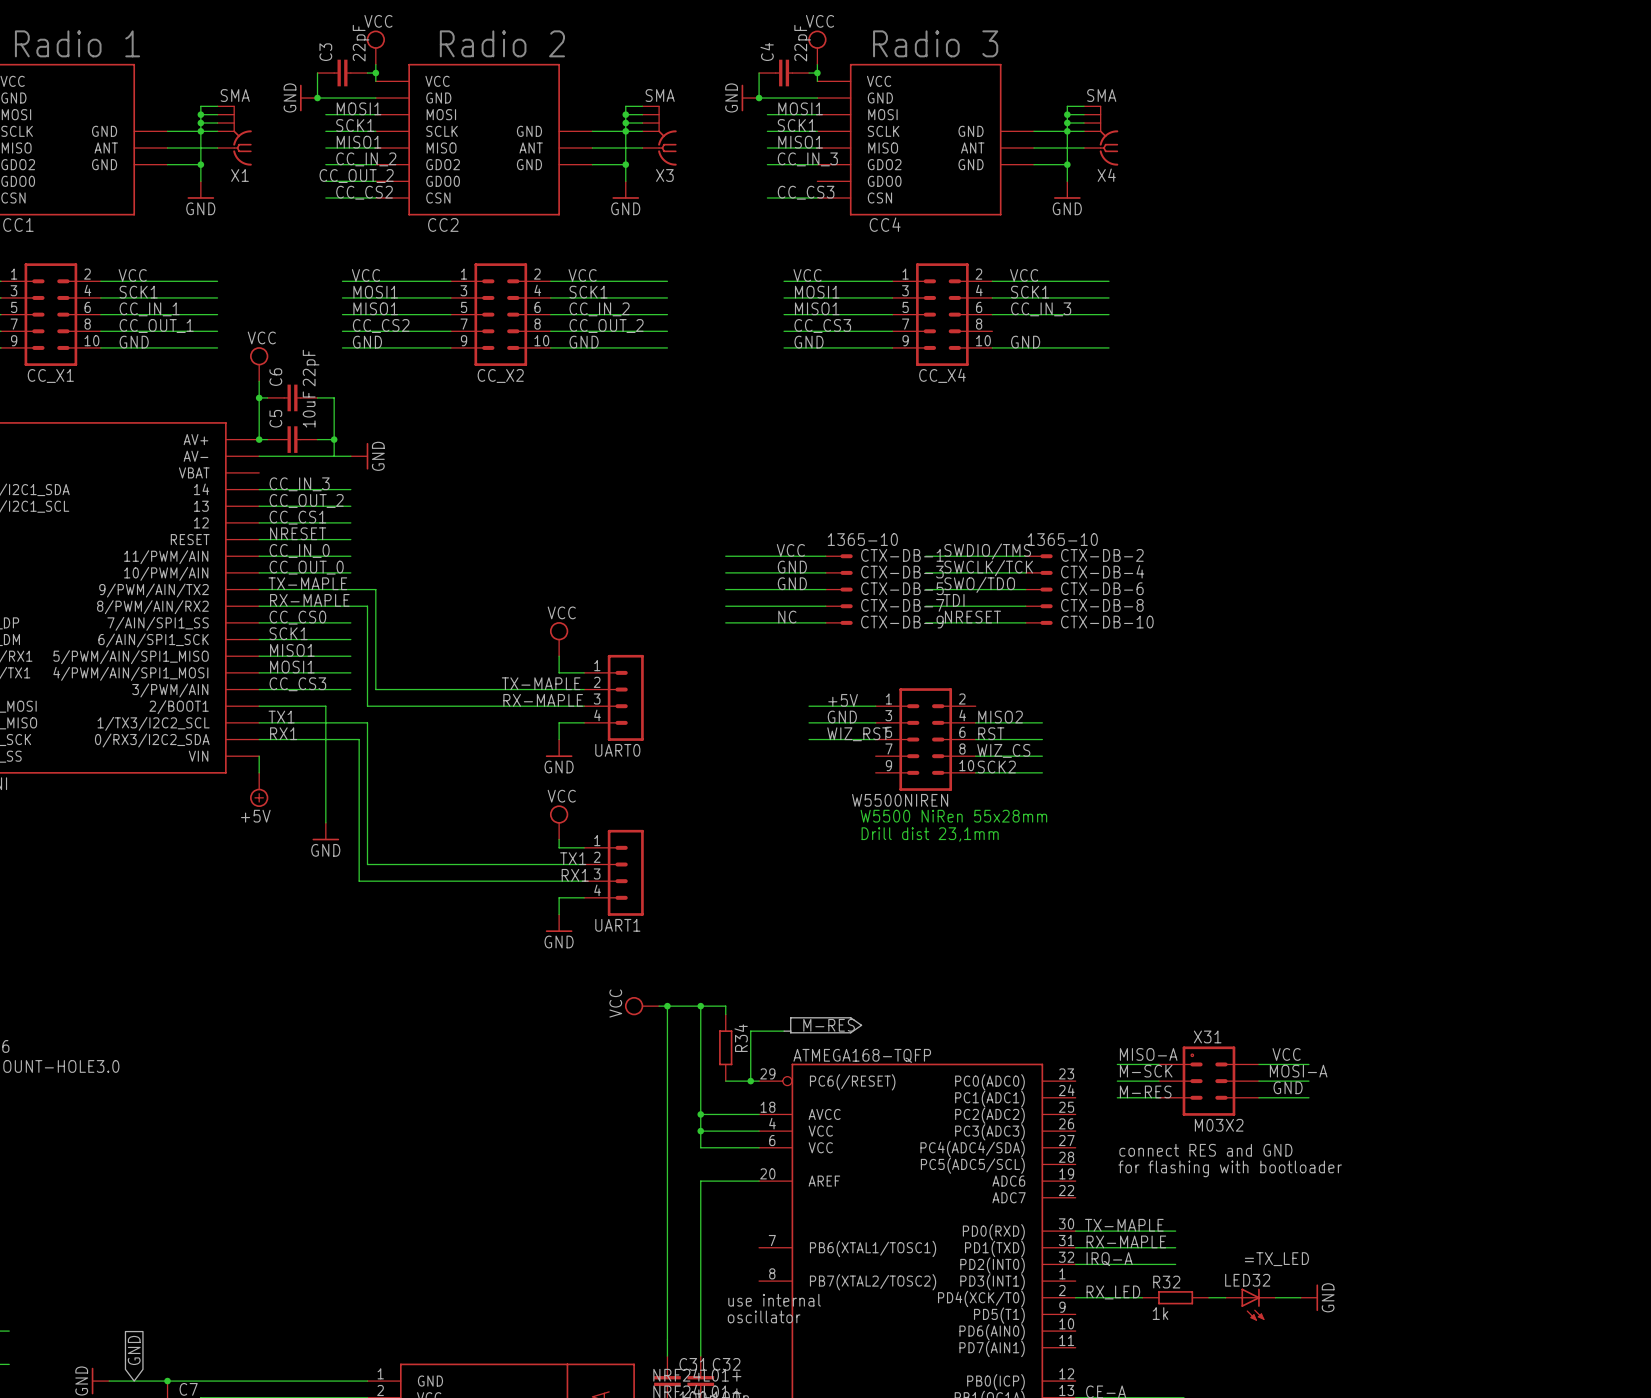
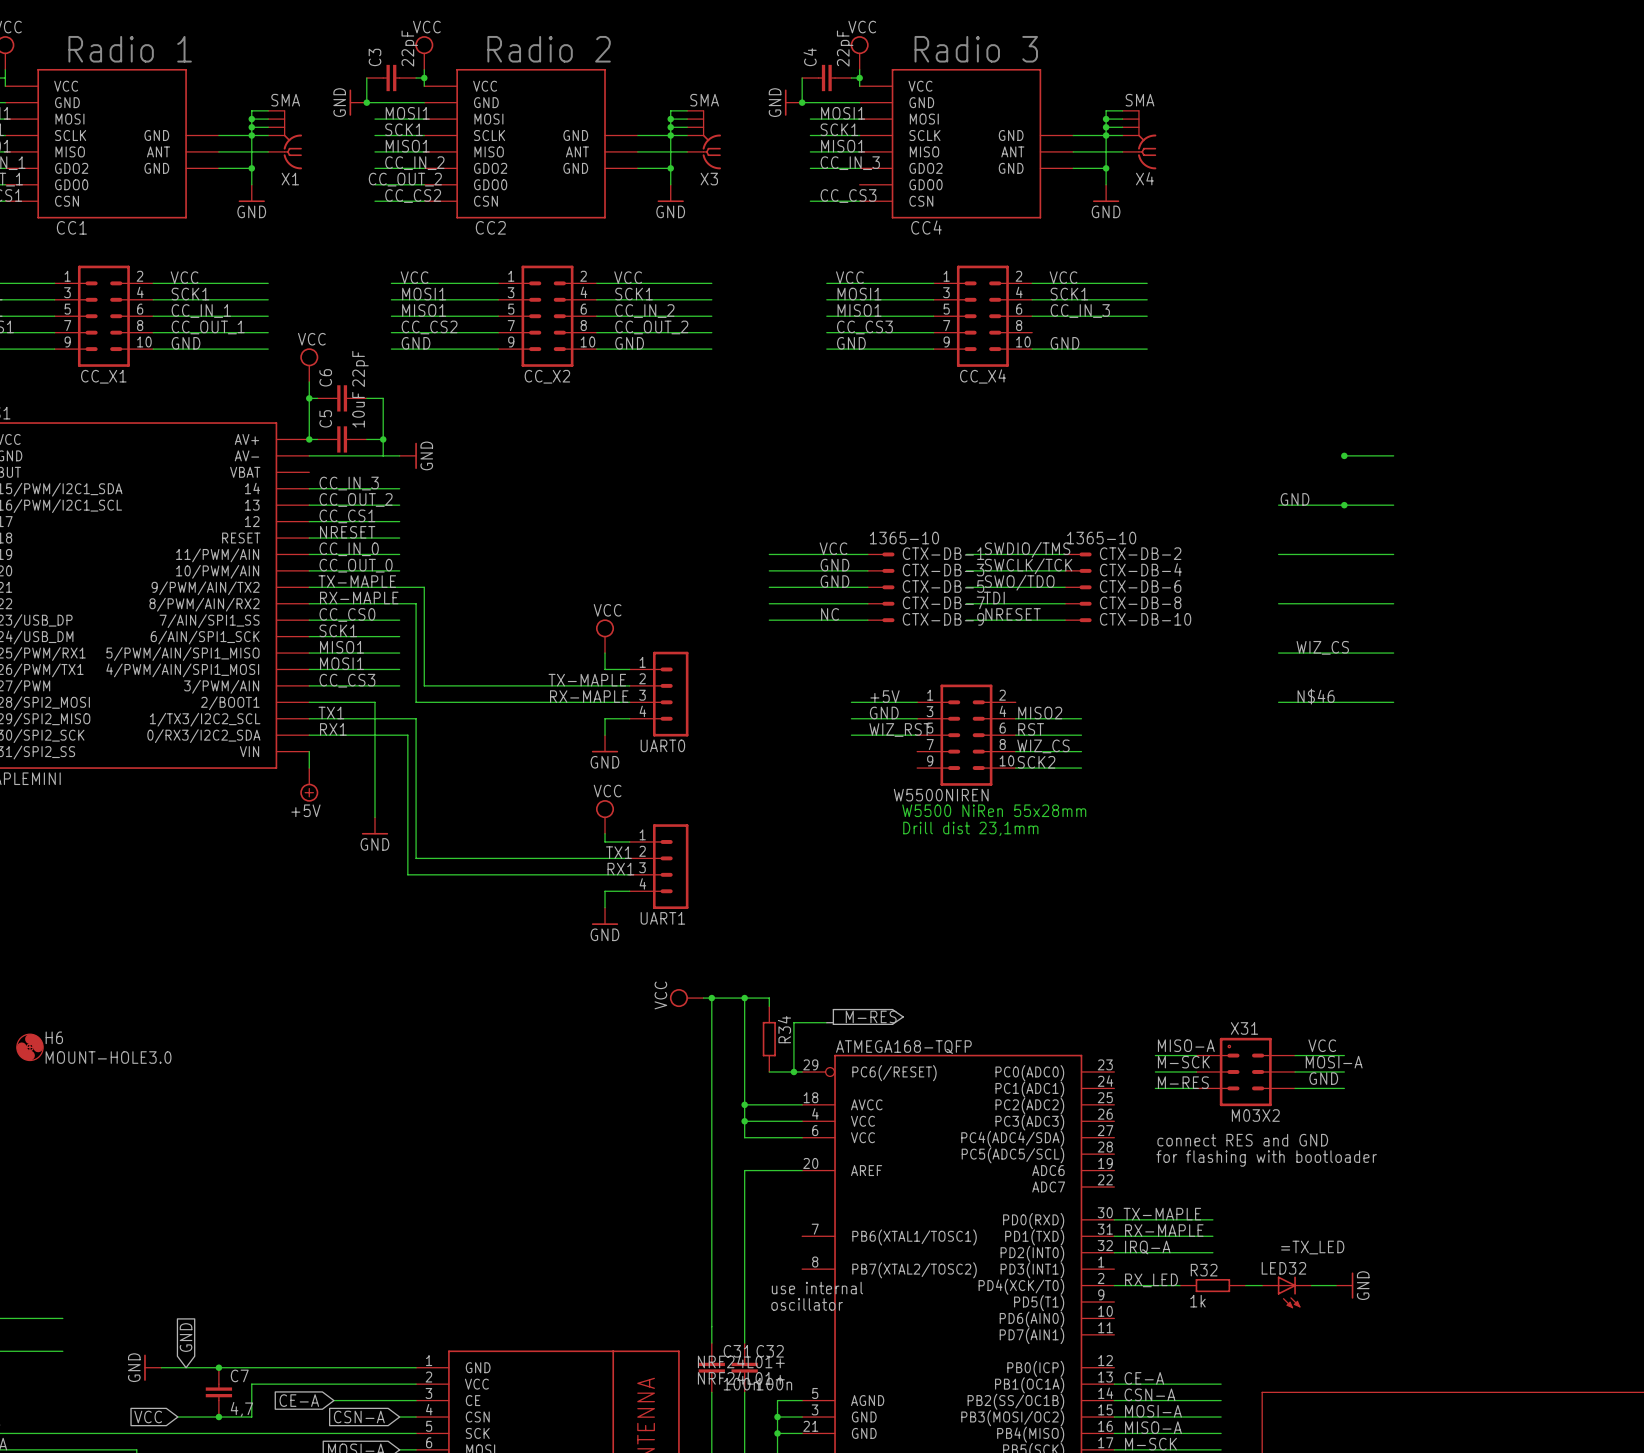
wire: none -> (1344, 455) (1393, 455)
junction: none -> (1344, 455)
label: none -> GND (1295, 499)
wire: none -> (1278, 505) (1393, 505)
junction: none -> (1344, 505)
wire: none -> (1278, 554) (1393, 554)
wire: none -> (1278, 603) (1393, 603)
label: none -> WIZ_CS (1322, 647)
wire: none -> (1278, 653) (1393, 653)
label: none -> N$46 (1316, 696)
wire: none -> (1278, 702) (1393, 702)

